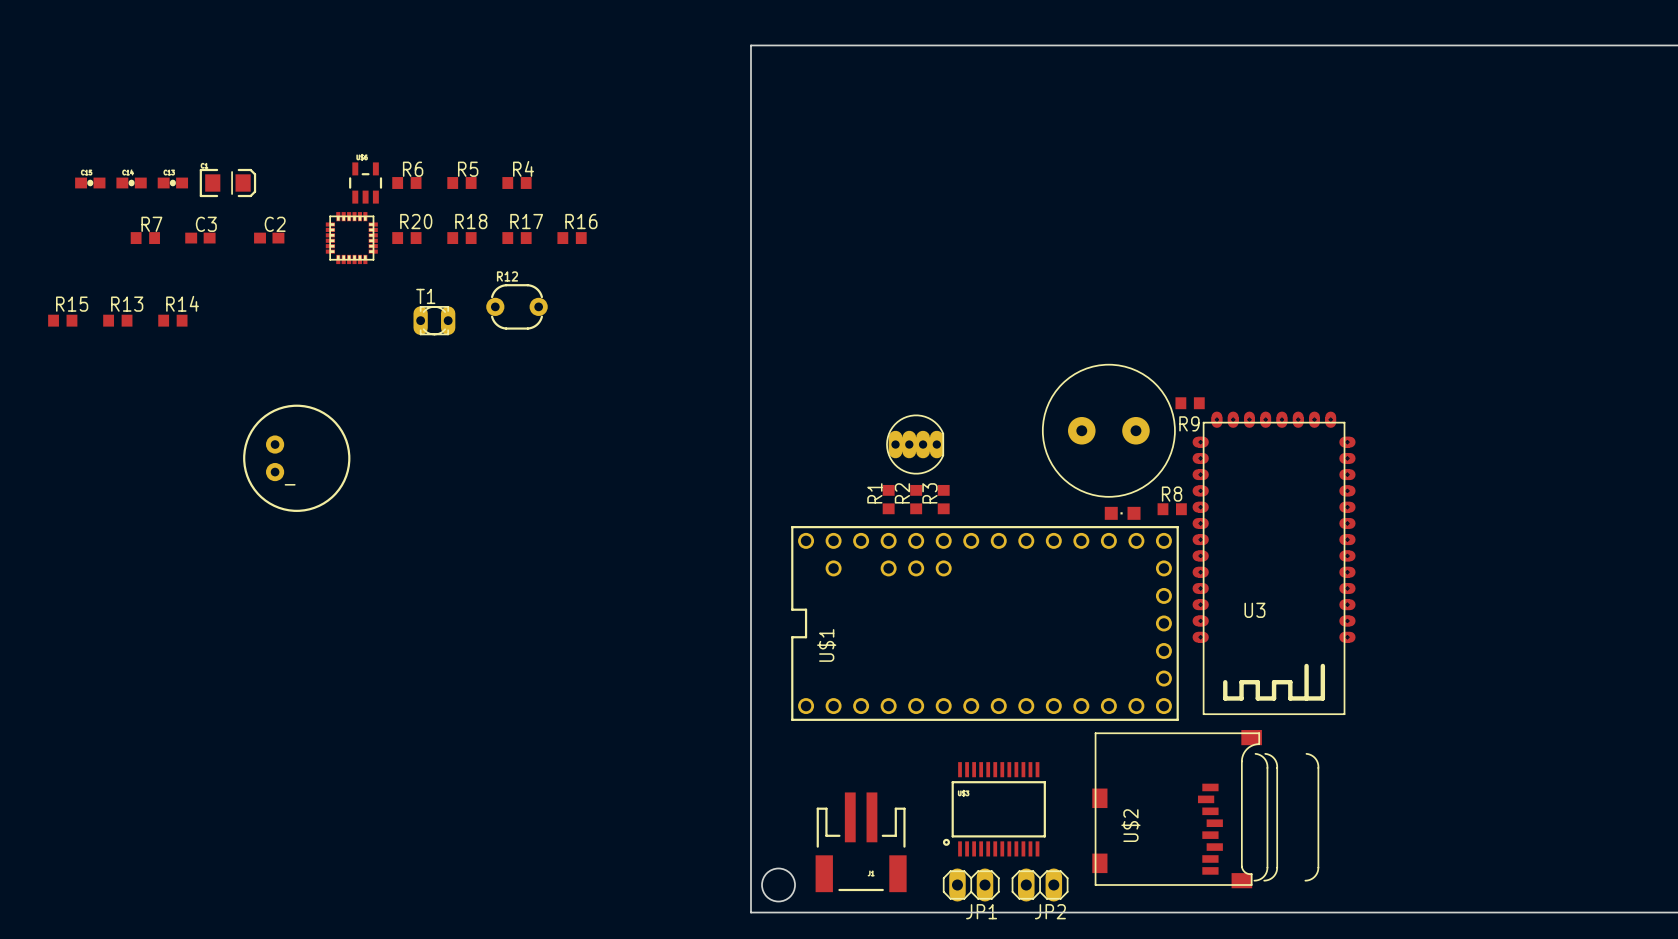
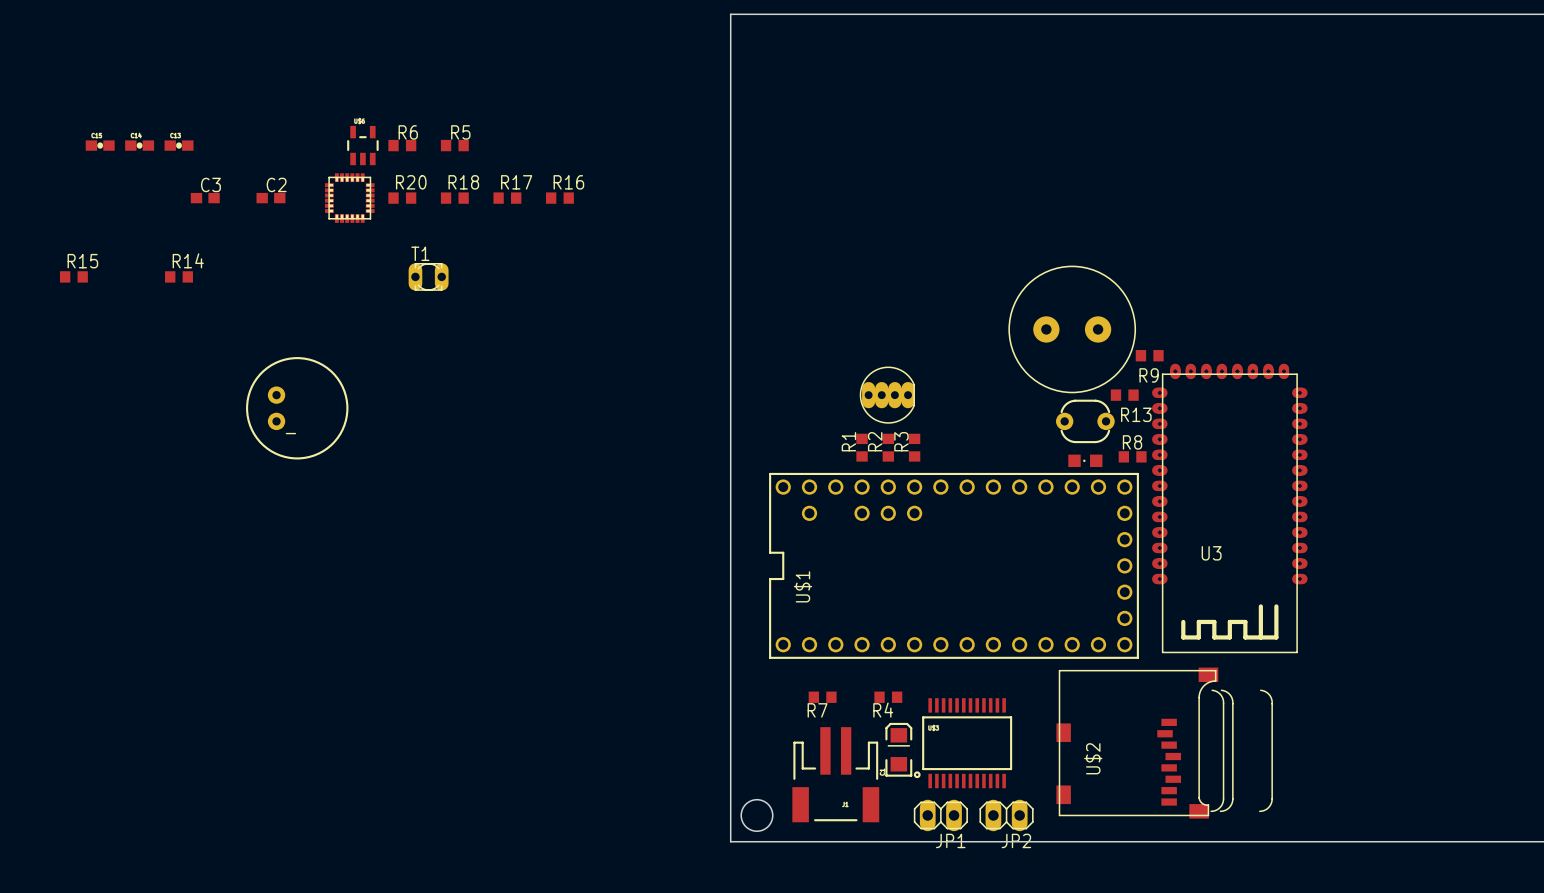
R4 name position: R4 (523, 168) -> R4 (883, 710)
part rotation: 0° (227, 183) -> 90° counterclockwise (898, 749)
part position: (227, 183) -> (898, 749)
R4 position: (516, 183) -> (888, 697)
R7 name position: R7 (151, 224) -> R7 (817, 710)
R7 position: (145, 238) -> (822, 697)
R13 name position: R13 (127, 304) -> R13 (1136, 414)
R12: (516, 306) -> none
R13 position: (117, 320) -> (1124, 395)
part position: (1108, 430) -> (1072, 329)
part: none -> (1085, 421)

